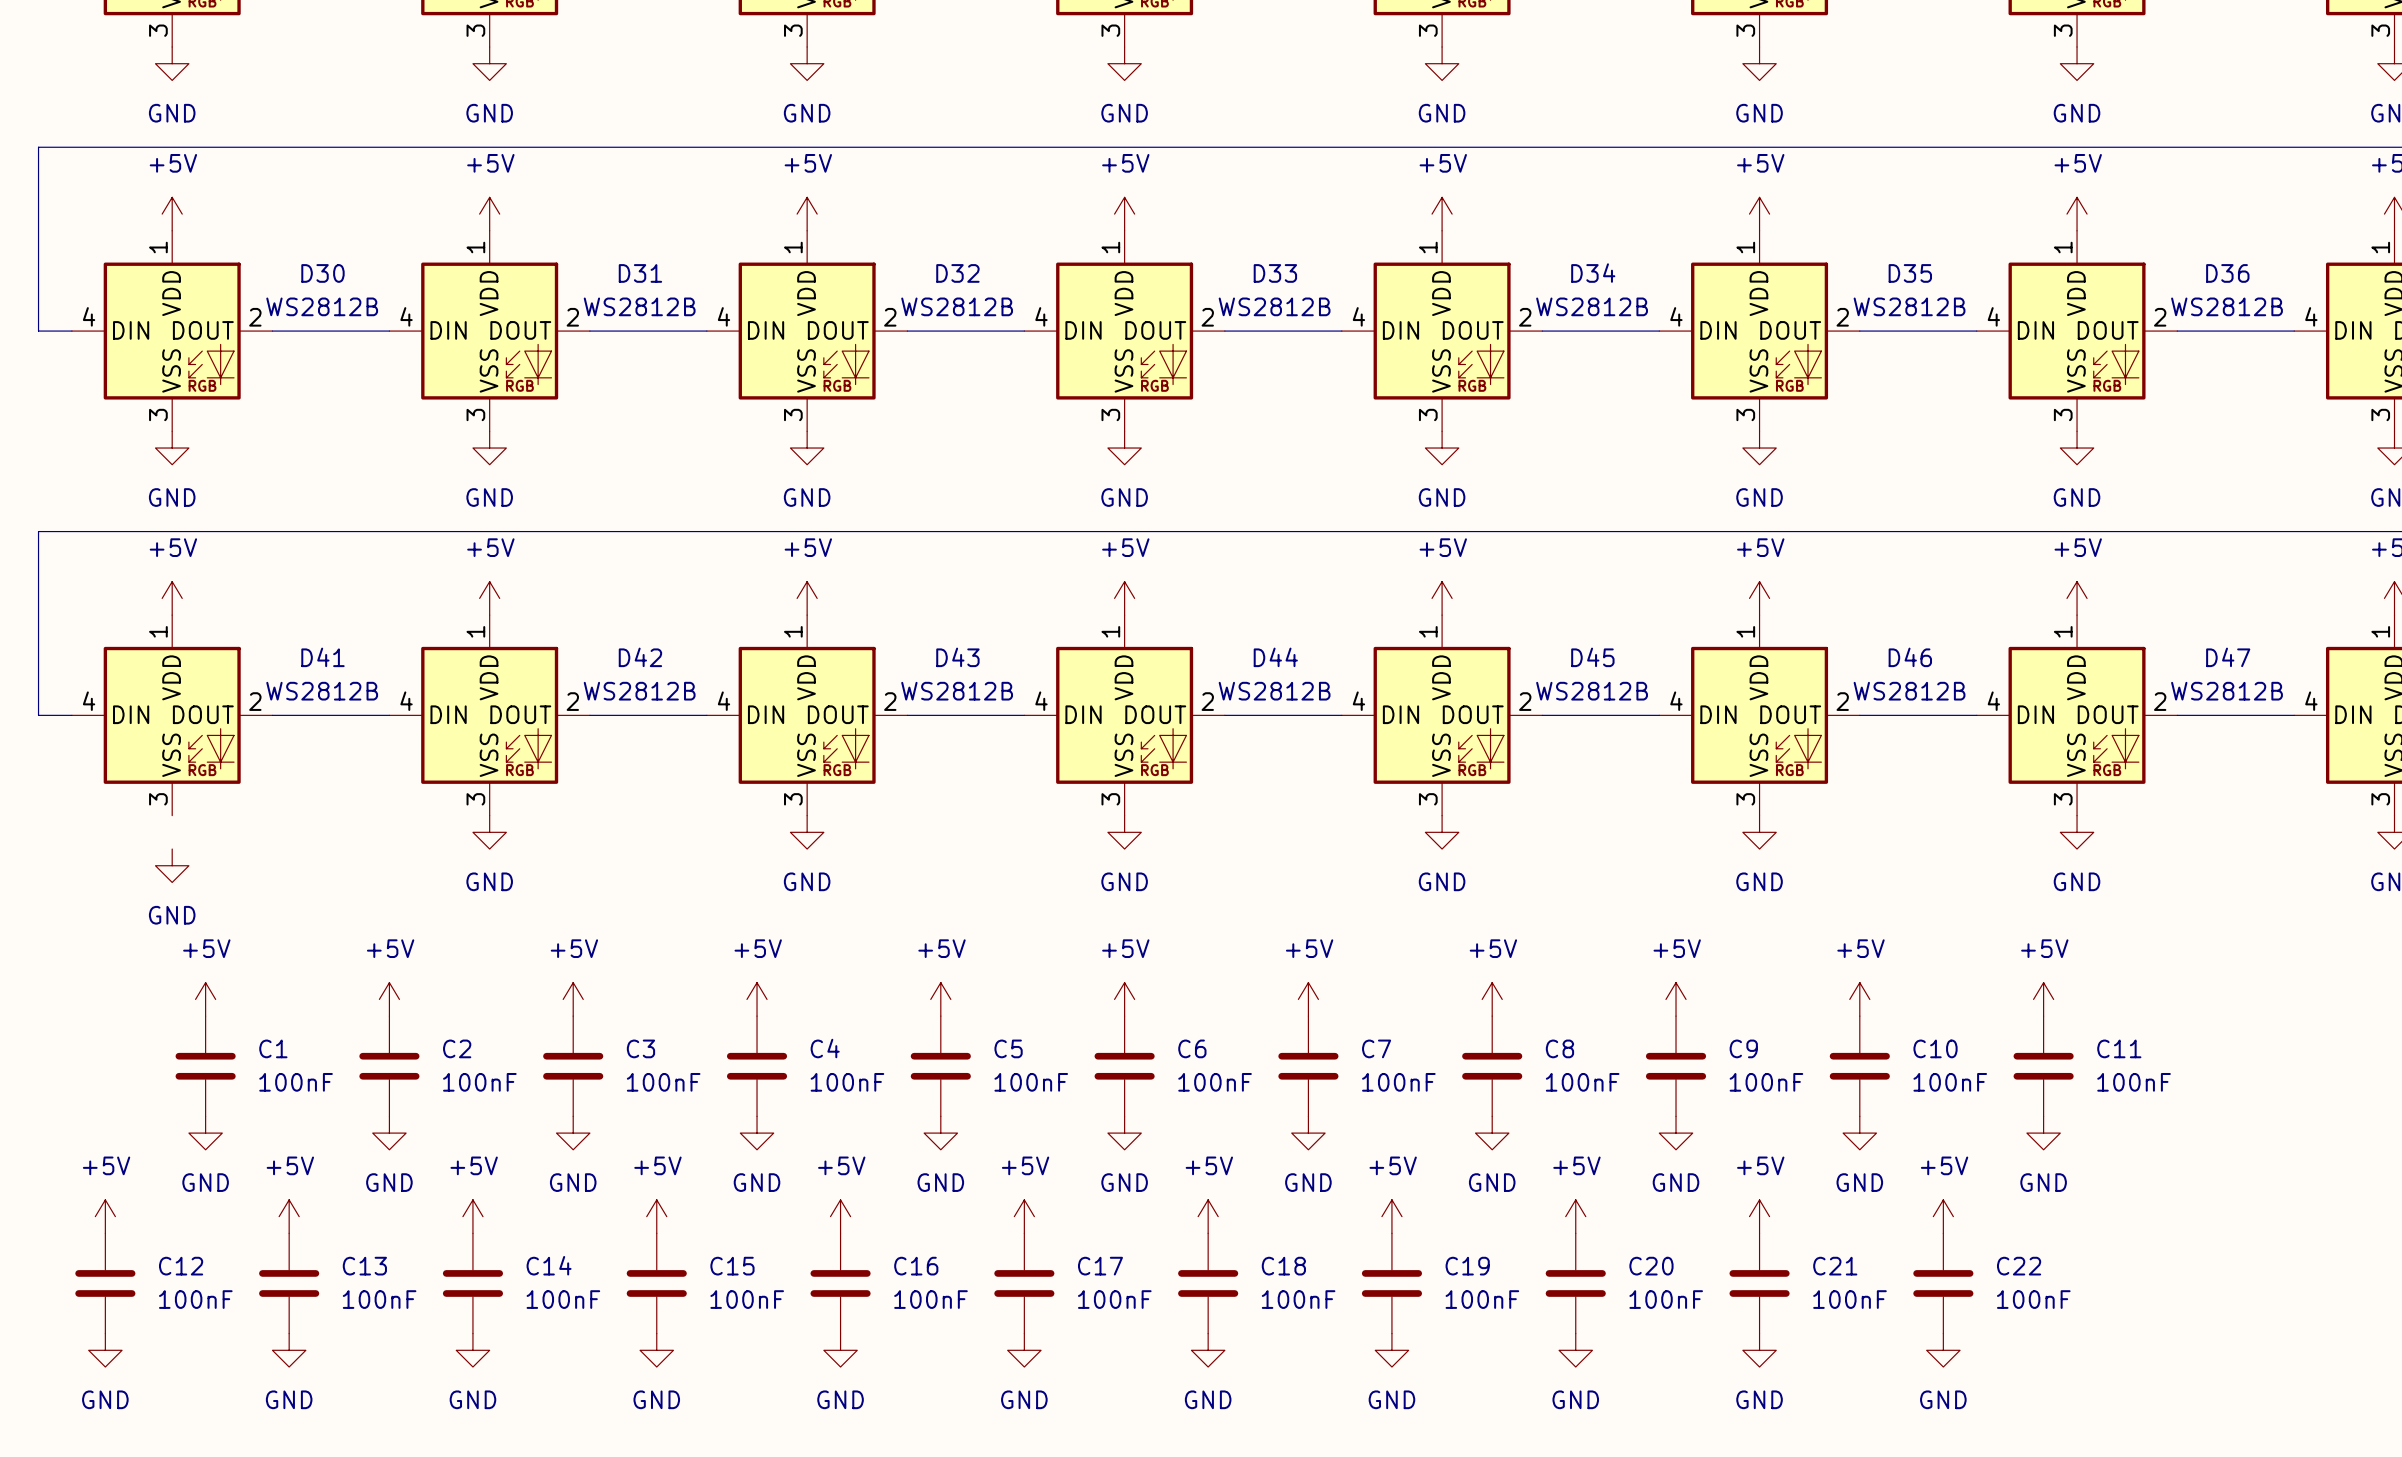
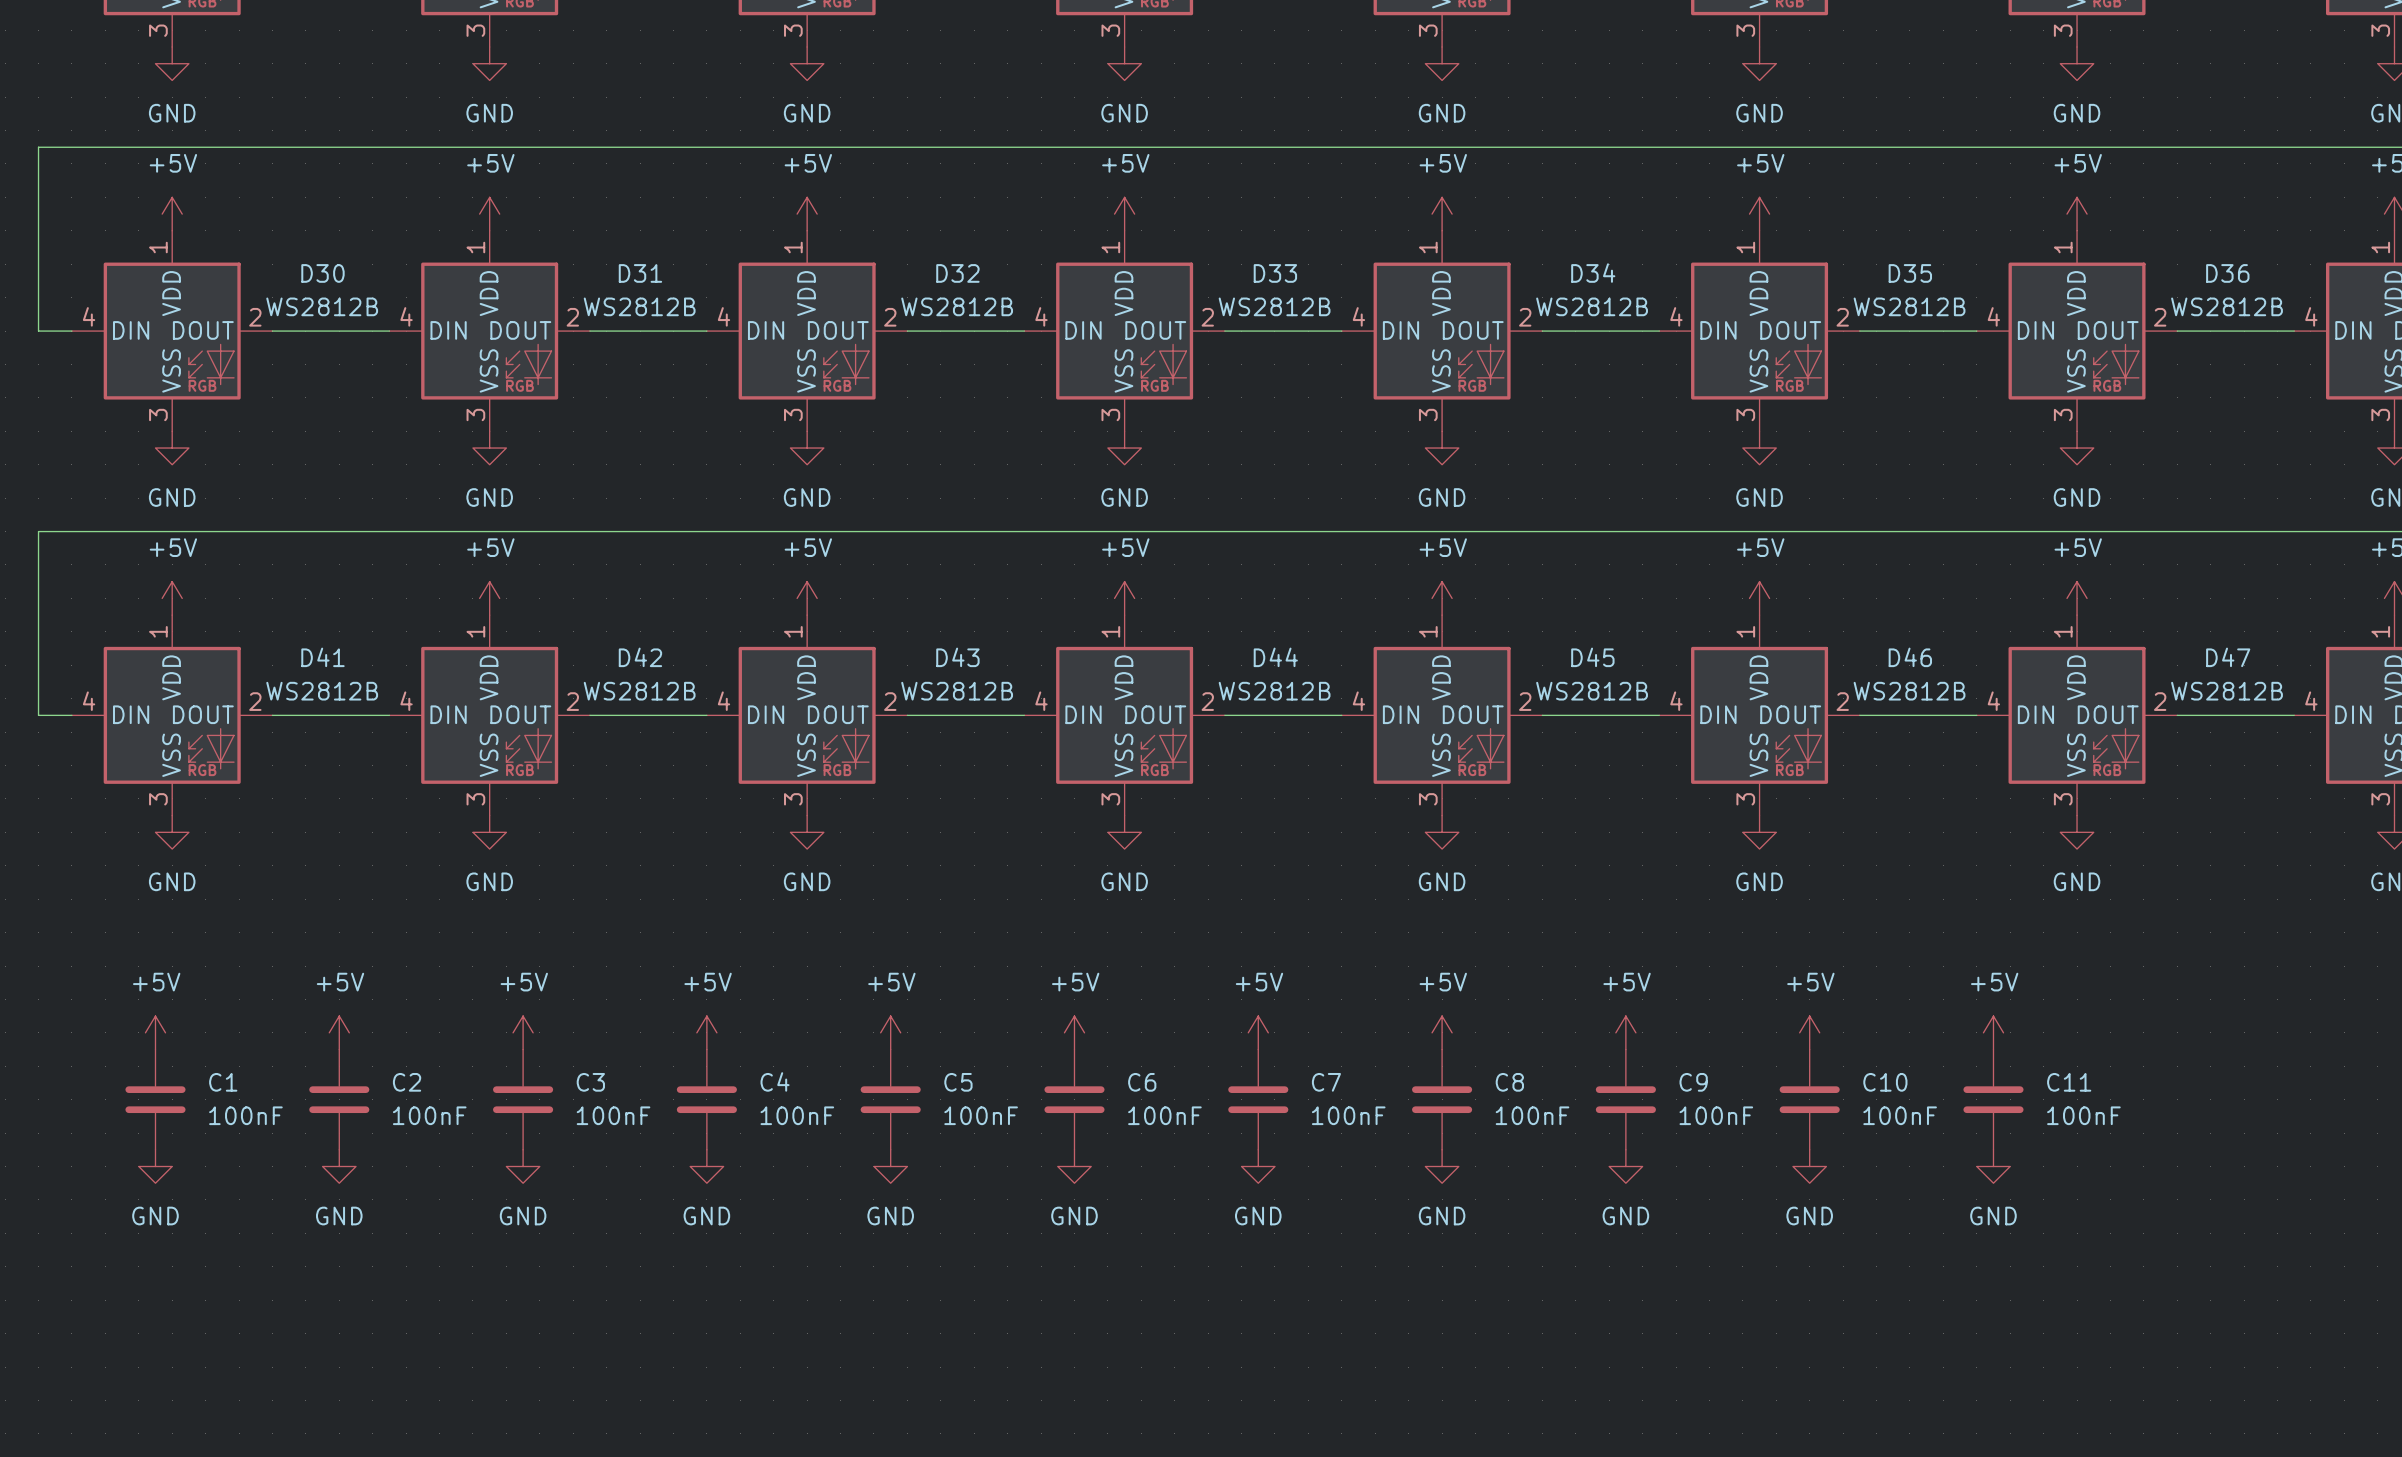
power symbol position: GND (172, 865) -> GND (172, 832)
power symbol position: +5V (205, 999) -> +5V (155, 1032)
power symbol position: +5V (389, 999) -> +5V (339, 1032)
power symbol position: +5V (573, 999) -> +5V (523, 1032)
power symbol position: +5V (757, 999) -> +5V (706, 1032)
power symbol position: +5V (940, 999) -> +5V (890, 1032)
power symbol position: +5V (1124, 999) -> +5V (1074, 1032)
power symbol position: +5V (1308, 999) -> +5V (1258, 1032)
power symbol position: +5V (1492, 999) -> +5V (1442, 1032)
power symbol position: +5V (1676, 999) -> +5V (1625, 1032)
power symbol position: +5V (1859, 999) -> +5V (1809, 1032)
power symbol position: +5V (2043, 999) -> +5V (1993, 1032)
C1 position: (205, 1066) -> (155, 1099)
C2 position: (389, 1066) -> (339, 1099)
C3 position: (573, 1066) -> (523, 1099)
C4 position: (757, 1066) -> (706, 1099)
C5 position: (940, 1066) -> (890, 1099)
C6 position: (1124, 1066) -> (1074, 1099)
C7 position: (1308, 1066) -> (1258, 1099)
C8 position: (1492, 1066) -> (1442, 1099)
C9 position: (1676, 1066) -> (1625, 1099)
C10 position: (1859, 1066) -> (1809, 1099)
C11 position: (2043, 1066) -> (1993, 1099)
power symbol position: GND (205, 1133) -> GND (155, 1166)
power symbol position: GND (389, 1133) -> GND (339, 1166)
power symbol position: GND (573, 1133) -> GND (523, 1166)
power symbol position: GND (757, 1133) -> GND (706, 1166)
power symbol position: GND (940, 1133) -> GND (890, 1166)
power symbol position: GND (1124, 1133) -> GND (1074, 1166)
power symbol position: GND (1308, 1133) -> GND (1258, 1166)
power symbol position: GND (1492, 1133) -> GND (1442, 1166)
power symbol position: GND (1676, 1133) -> GND (1625, 1166)
power symbol position: GND (1859, 1133) -> GND (1809, 1166)
power symbol position: GND (2043, 1133) -> GND (1993, 1166)
power symbol: +5V (105, 1216) -> none
power symbol: +5V (289, 1216) -> none
power symbol: +5V (472, 1216) -> none
power symbol: +5V (656, 1216) -> none
power symbol: +5V (840, 1216) -> none
power symbol: +5V (1024, 1216) -> none
power symbol: +5V (1208, 1216) -> none
power symbol: +5V (1391, 1216) -> none
power symbol: +5V (1575, 1216) -> none
power symbol: +5V (1759, 1216) -> none
power symbol: +5V (1943, 1216) -> none
C12: 100nF (105, 1283) -> none
C13: 100nF (289, 1283) -> none
C14: 100nF (472, 1283) -> none
C15: 100nF (656, 1283) -> none
C16: 100nF (840, 1283) -> none
C17: 100nF (1024, 1283) -> none
C18: 100nF (1208, 1283) -> none
C19: 100nF (1391, 1283) -> none
C20: 100nF (1575, 1283) -> none
C21: 100nF (1759, 1283) -> none
C22: 100nF (1943, 1283) -> none
power symbol: GND (105, 1350) -> none
power symbol: GND (289, 1350) -> none
power symbol: GND (472, 1350) -> none
power symbol: GND (656, 1350) -> none
power symbol: GND (840, 1350) -> none
power symbol: GND (1024, 1350) -> none
power symbol: GND (1208, 1350) -> none
power symbol: GND (1391, 1350) -> none
power symbol: GND (1575, 1350) -> none
power symbol: GND (1759, 1350) -> none
power symbol: GND (1943, 1350) -> none

